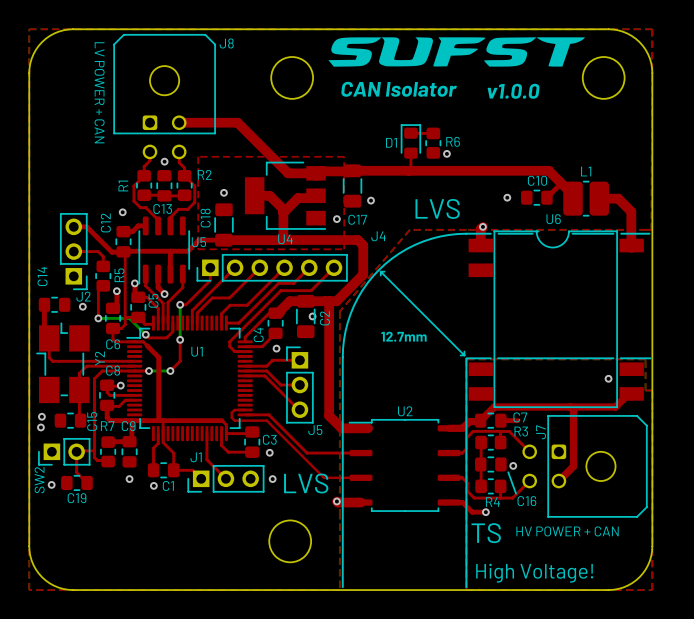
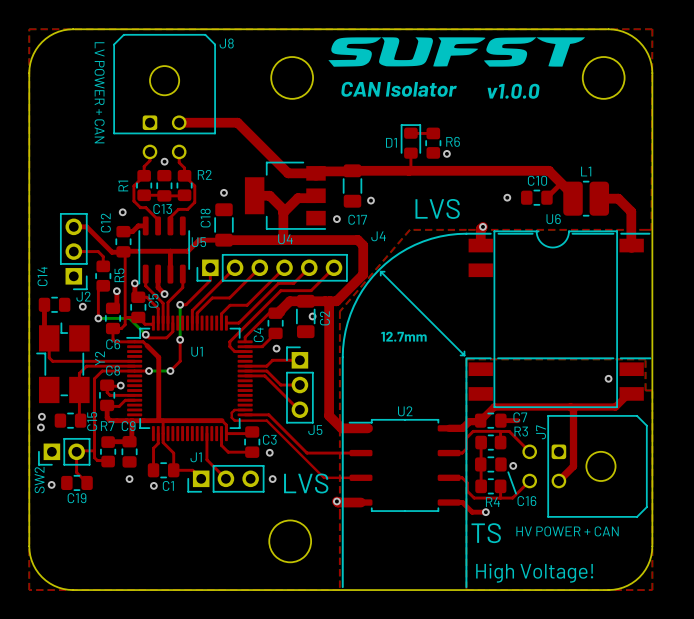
top zone outline: (198, 156) (198, 249) (344, 249) (344, 156) (198, 156) -> none

